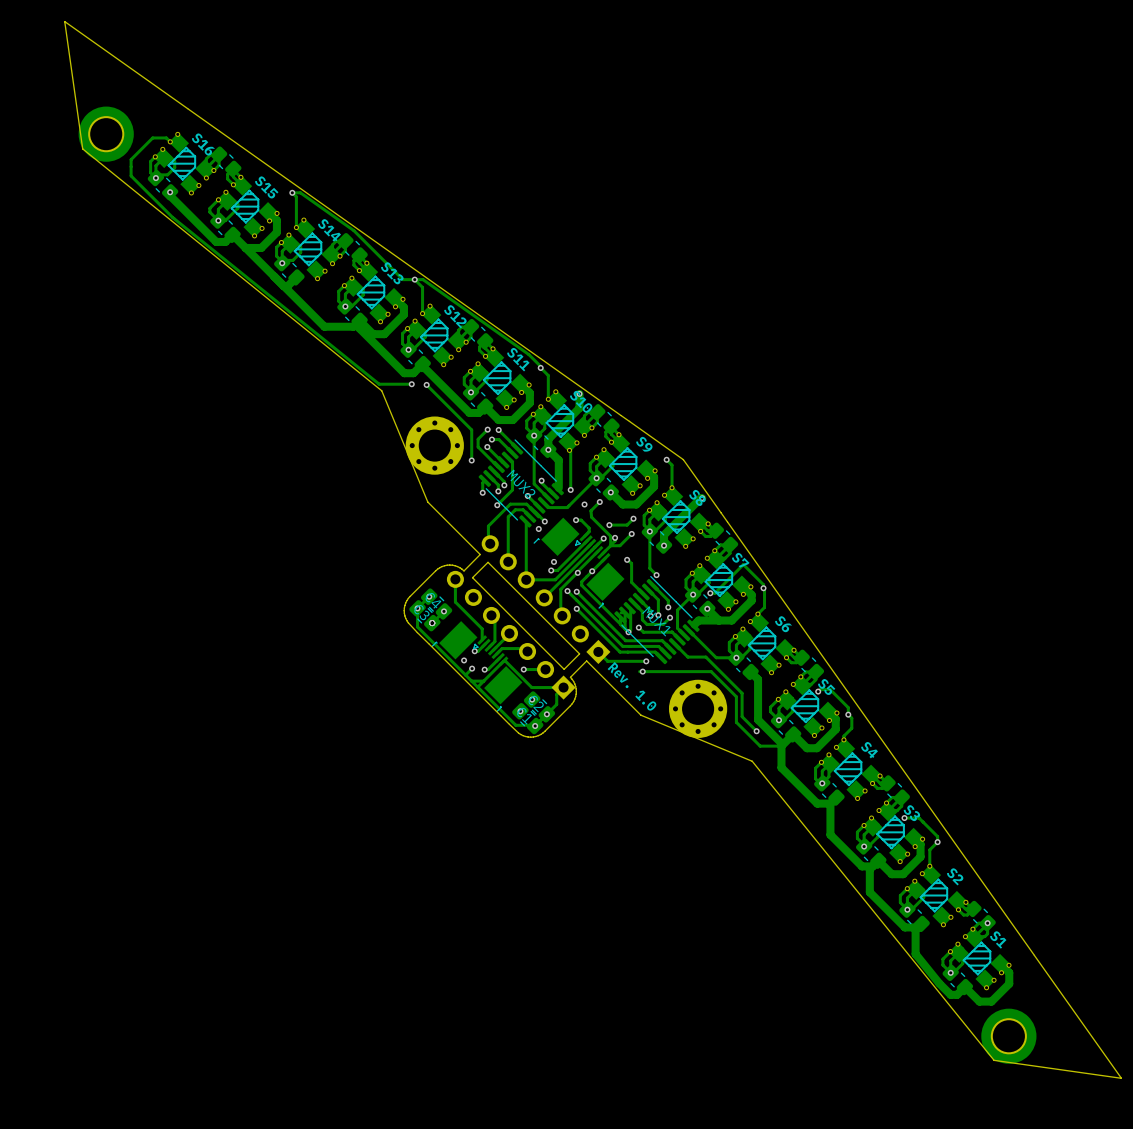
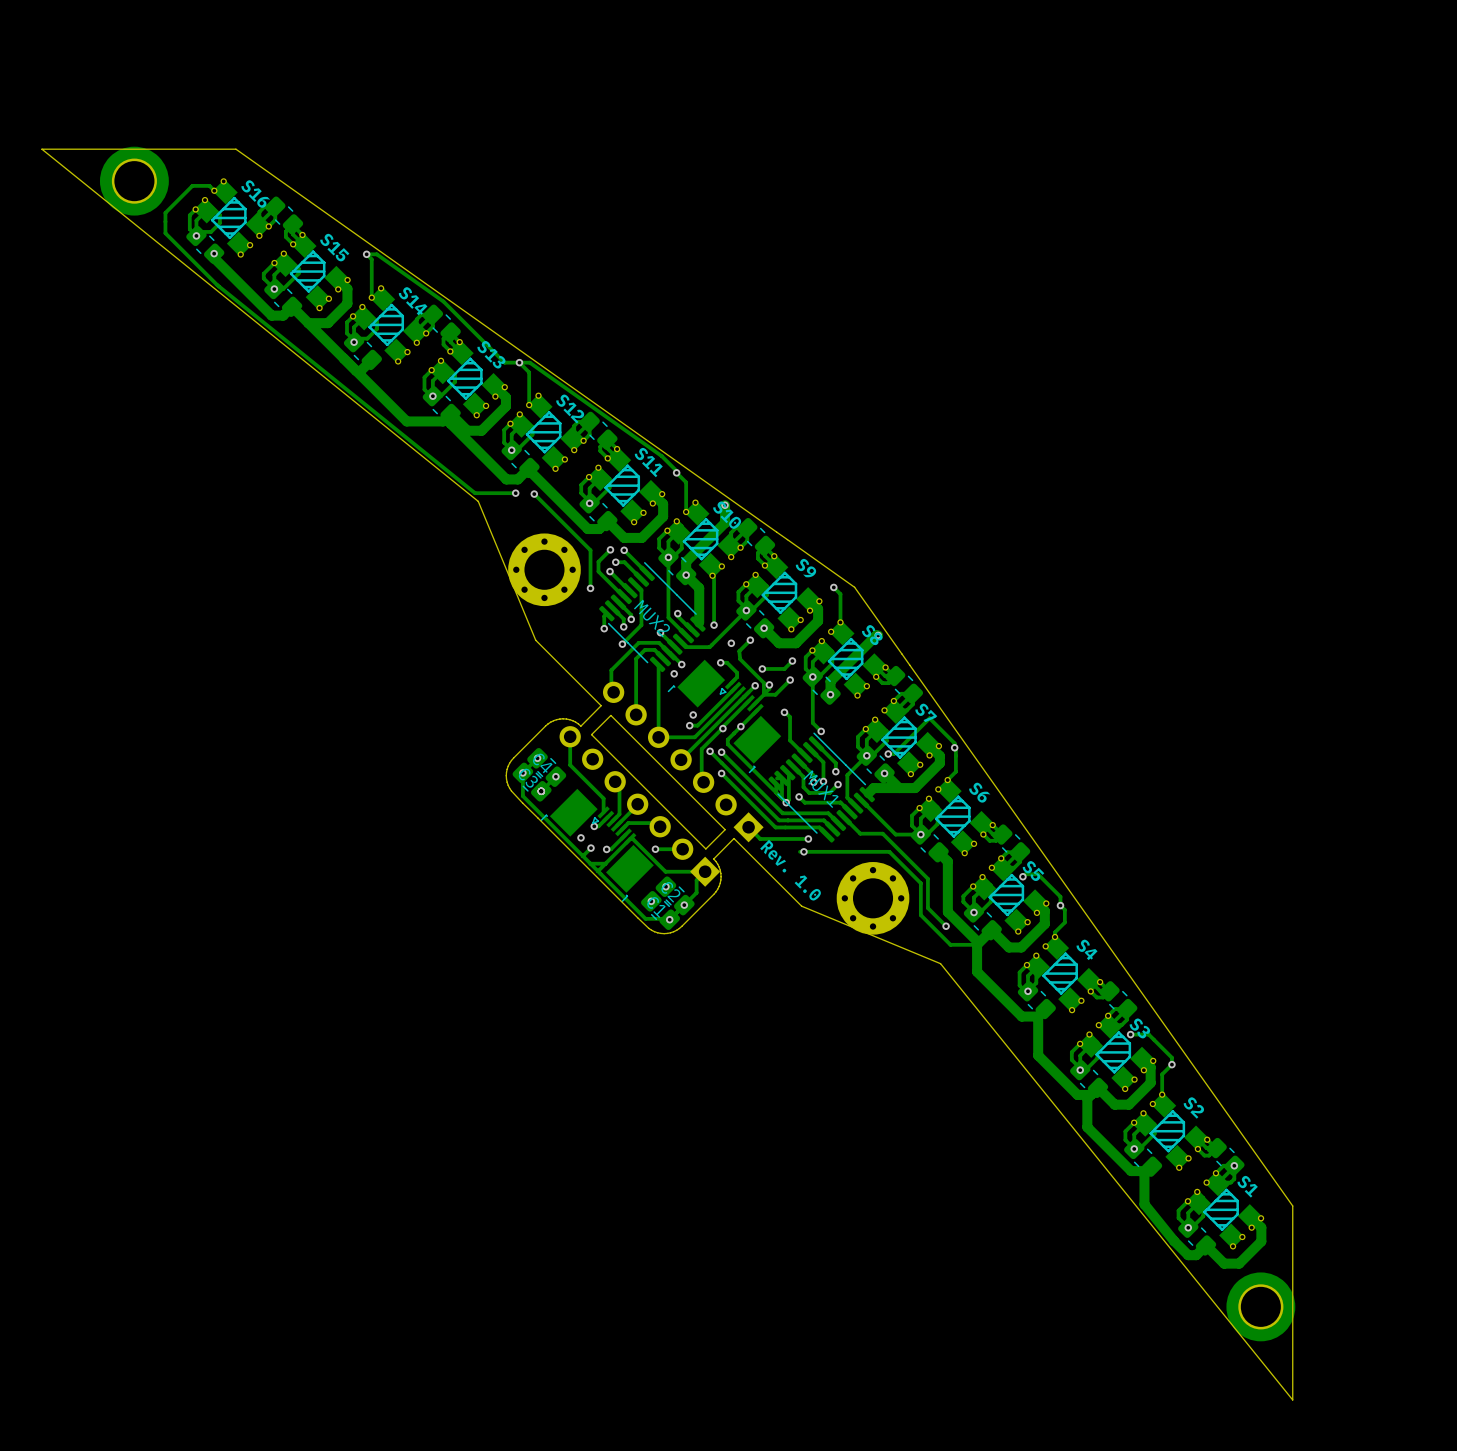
board edge: (187, 108) (64, 21) (82, 148) (381, 390) -> (235, 149) (41, 149) (478, 501)
board edge: (752, 761) (994, 1060) (1121, 1078) (1034, 955) -> (940, 963) (1292, 1399) (1292, 1205)

